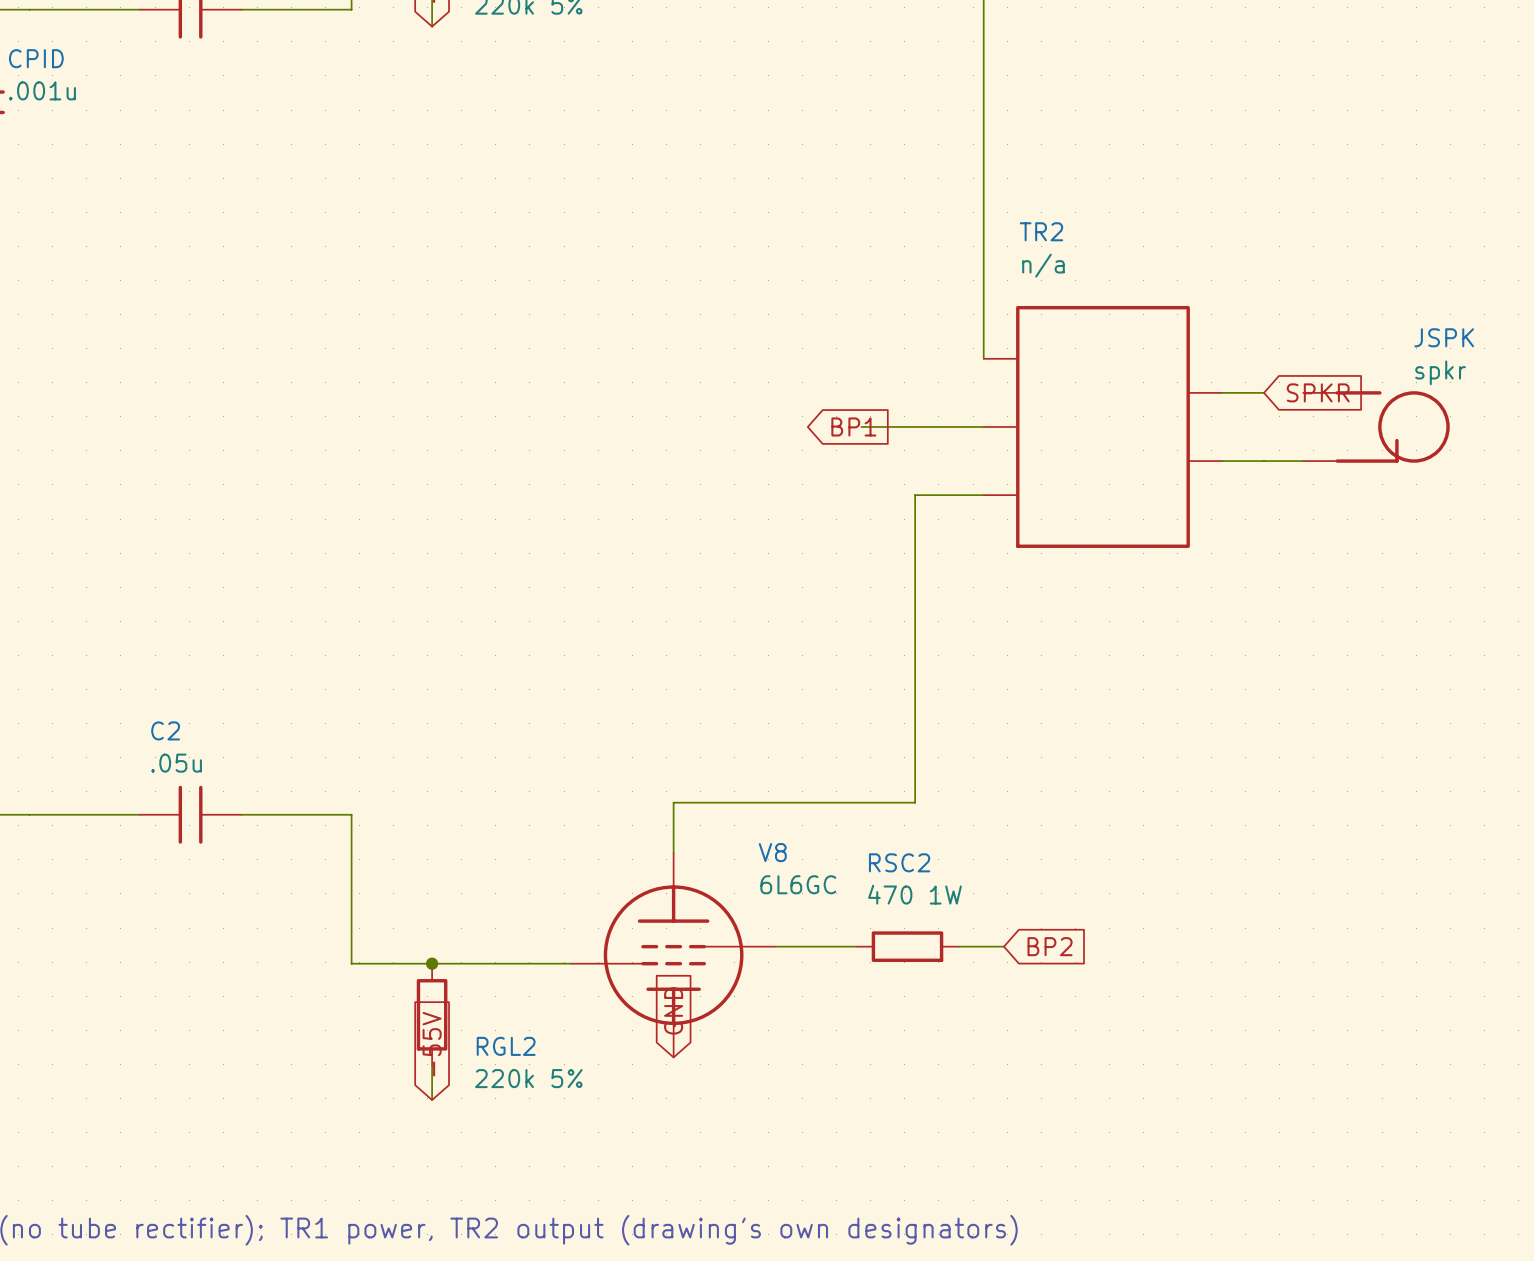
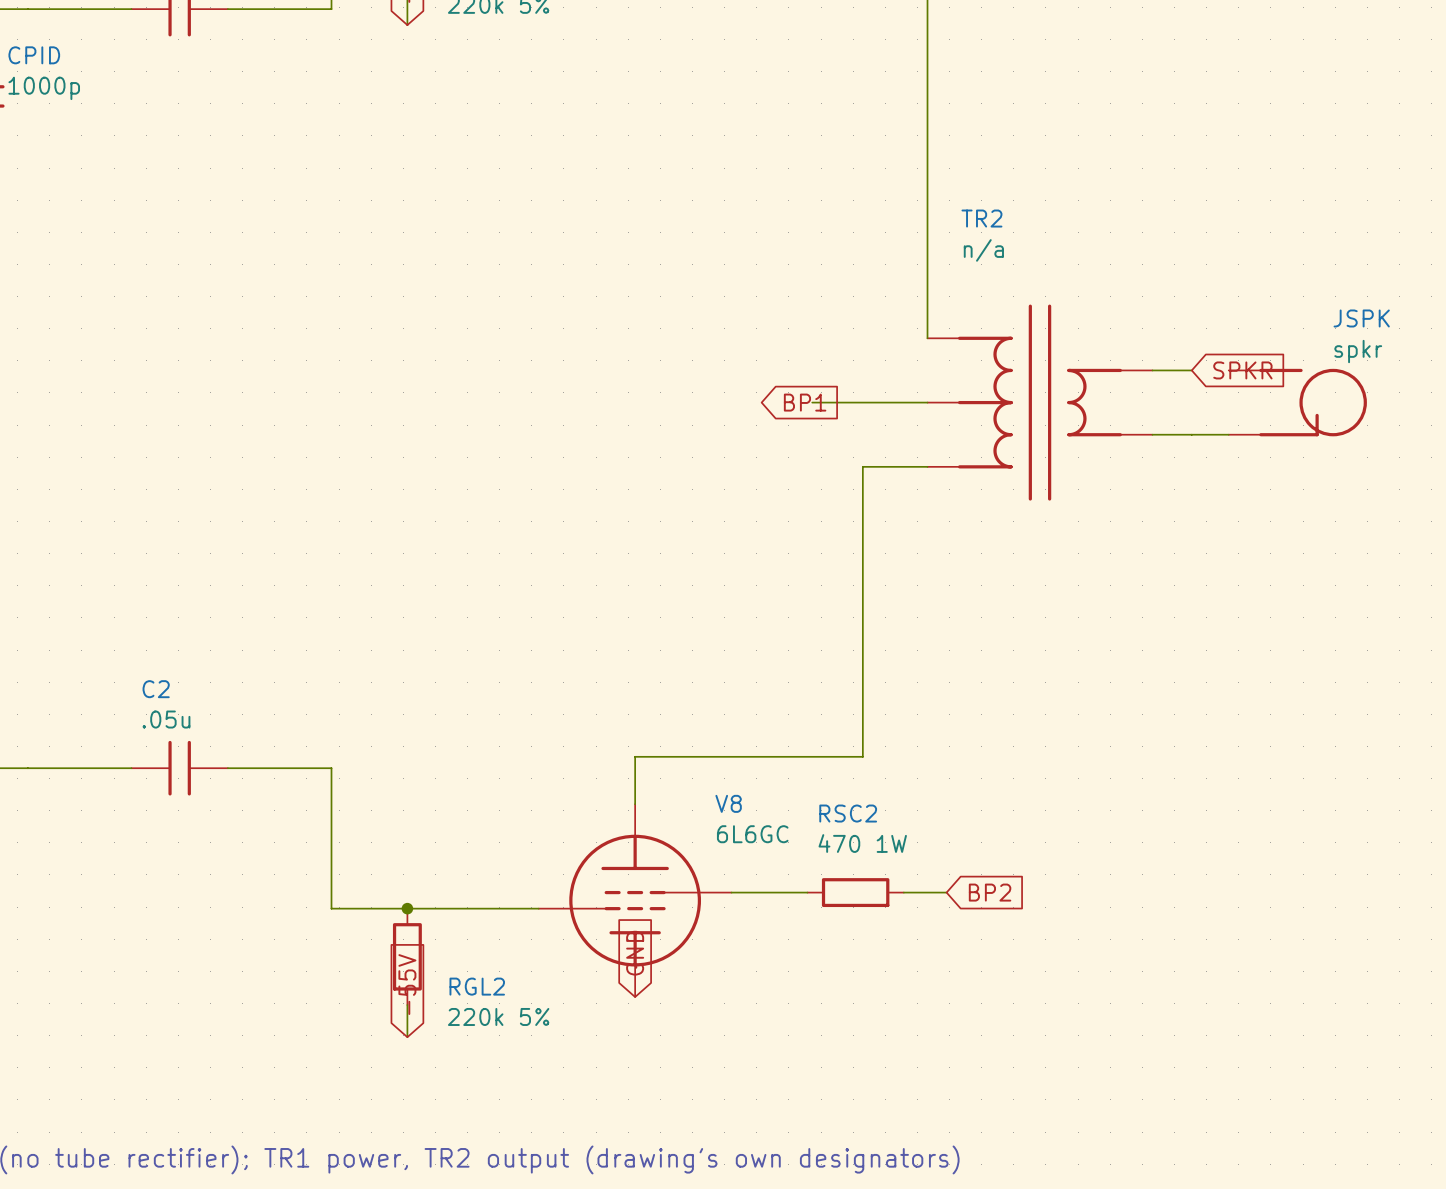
CPID value: .001u (42, 90) -> 1000p (44, 88)
TR2 symbol: [983, 305, 1223, 548] -> [927, 304, 1153, 501]

